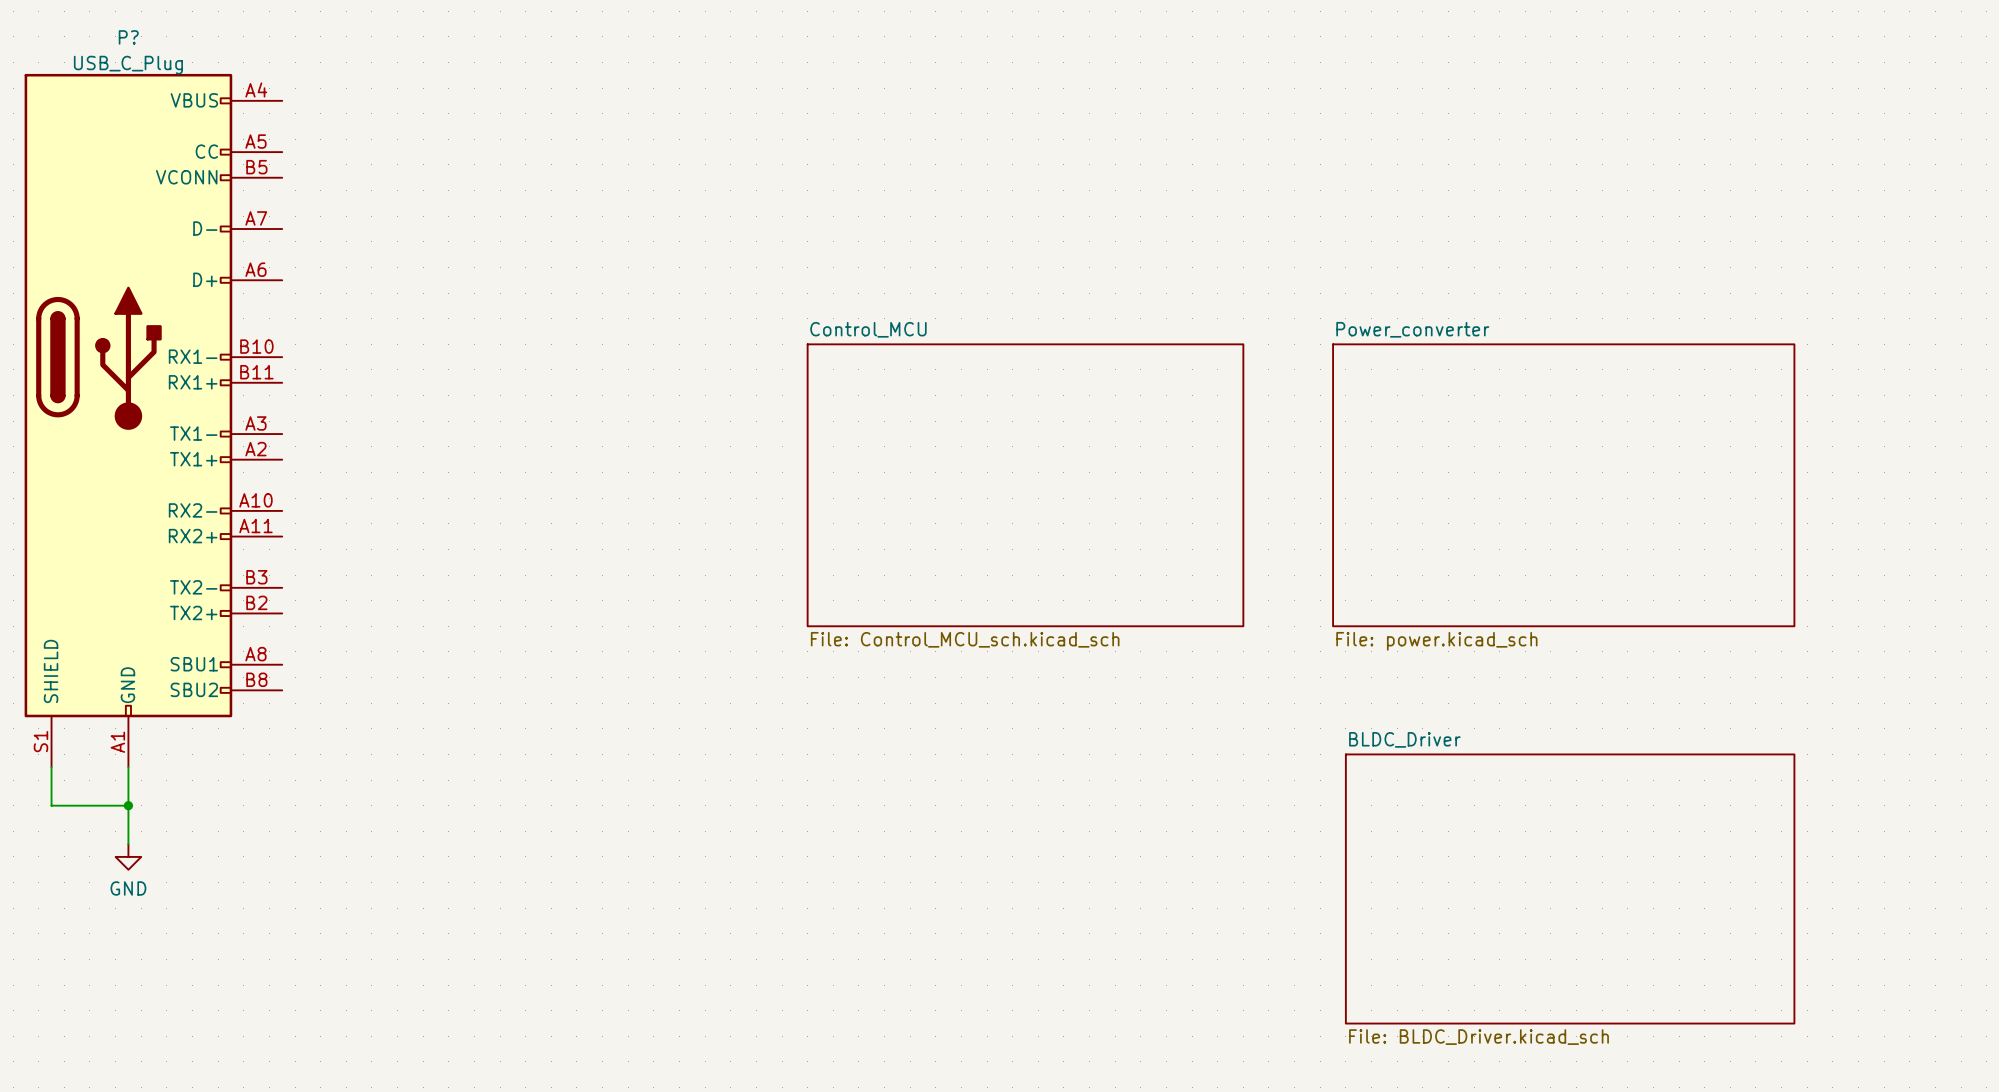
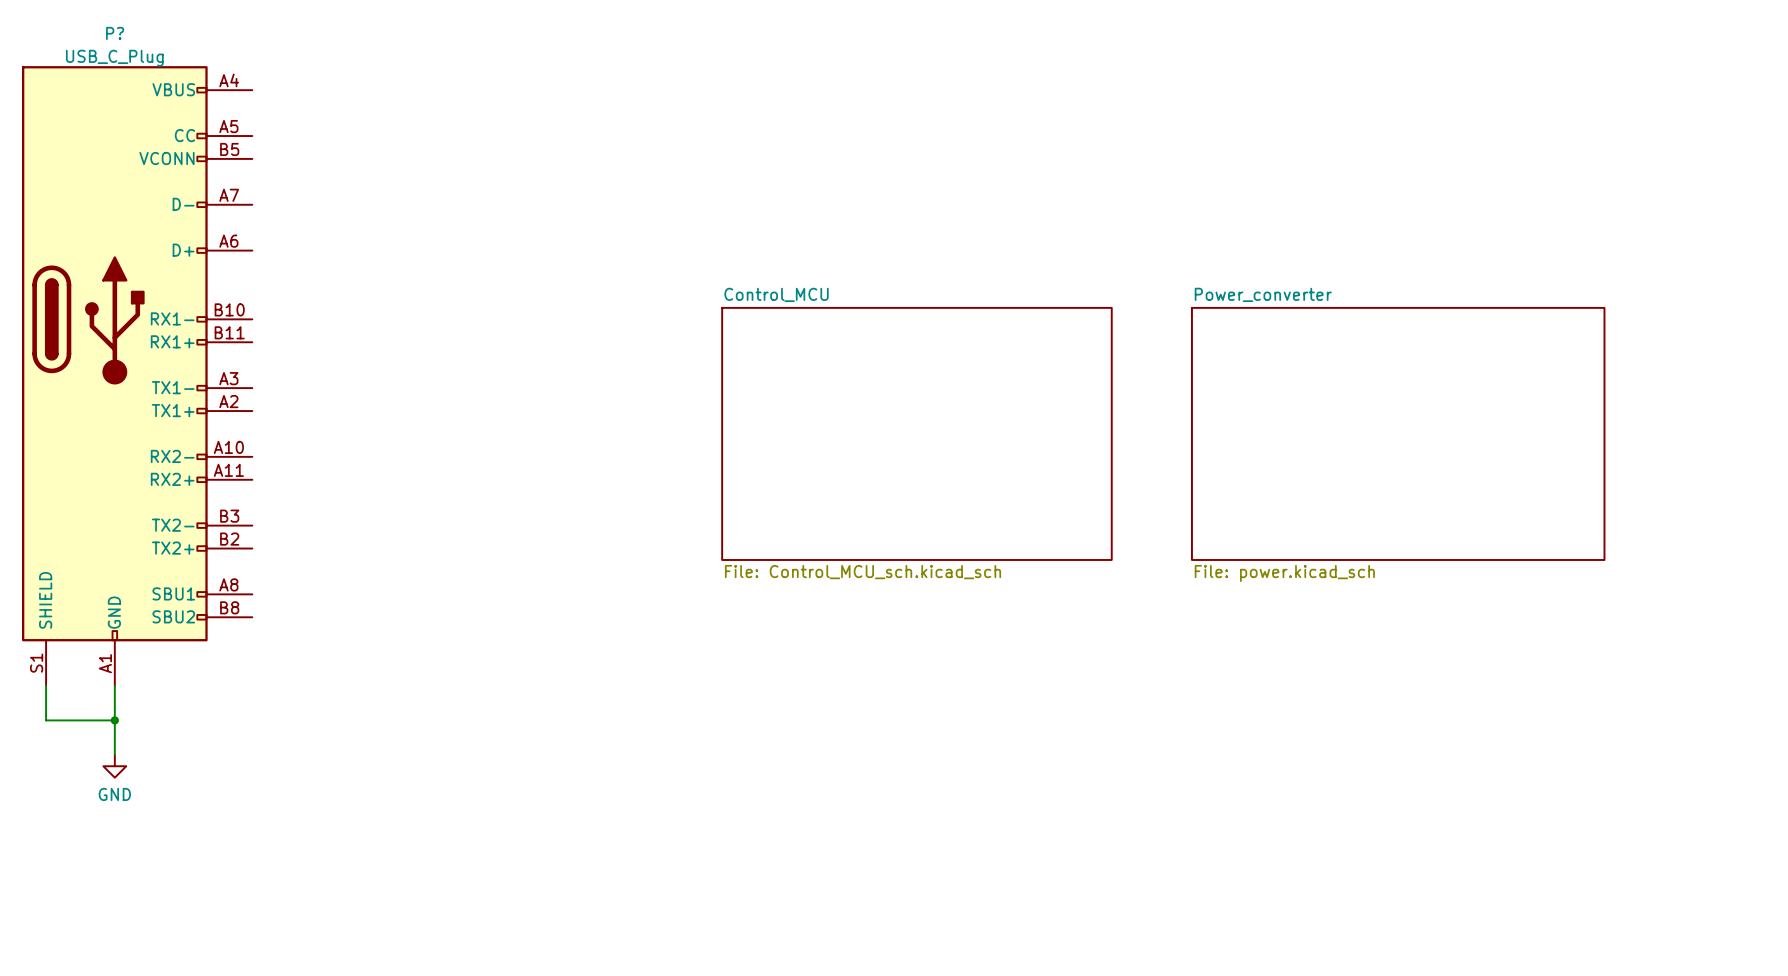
sheet BLDC_Driver: File: BLDC_Driver.kicad_sch (1570, 888) -> none

